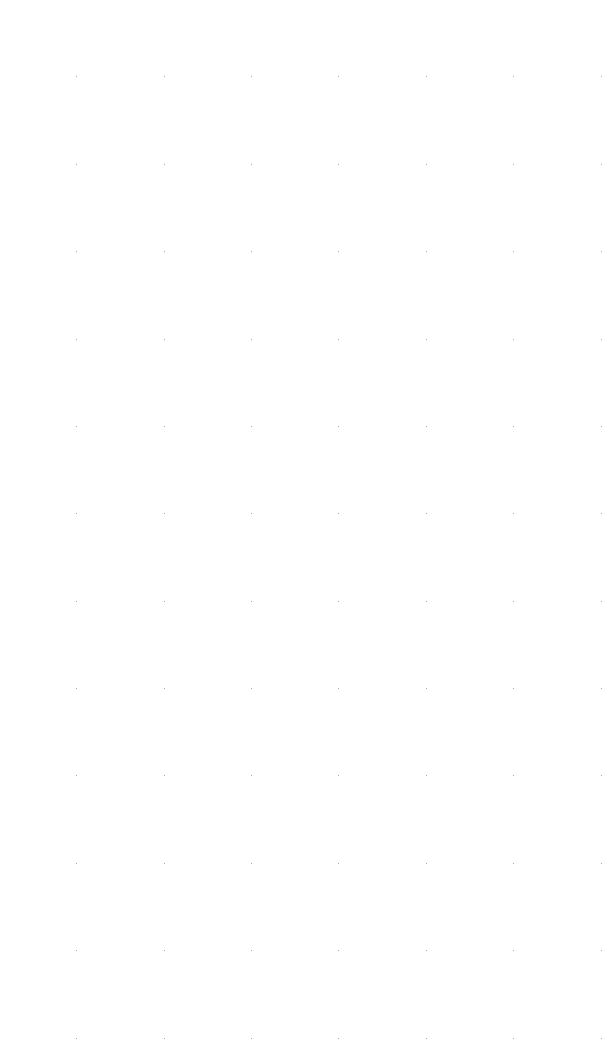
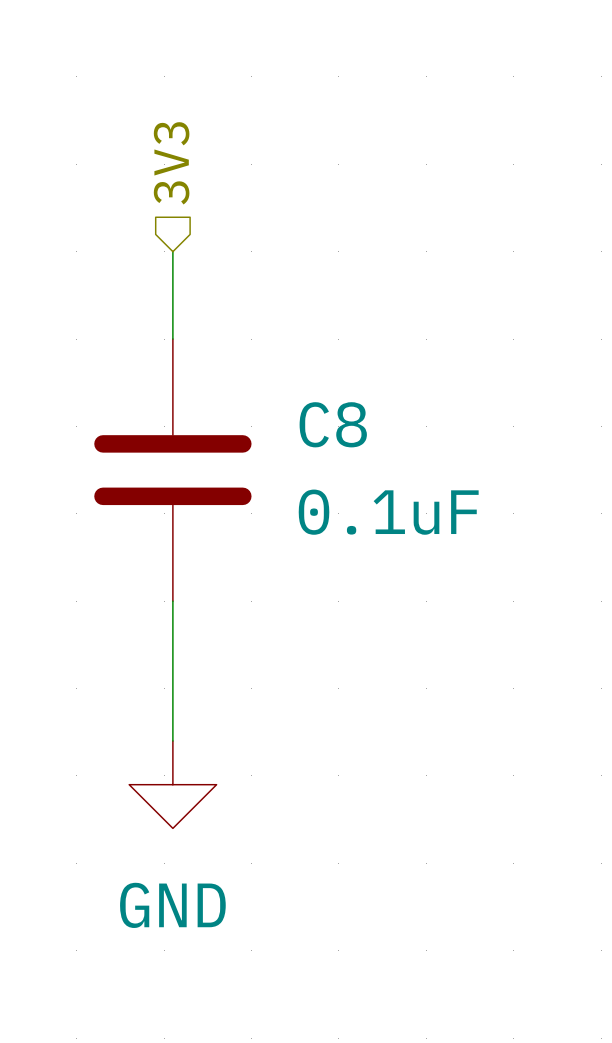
hierarchical label: none -> 3V3 (171, 163)
wire: none -> (172, 251) (172, 339)
C8: none -> 0.1uF (172, 470)
wire: none -> (172, 601) (172, 740)
power symbol: none -> GND (172, 784)

